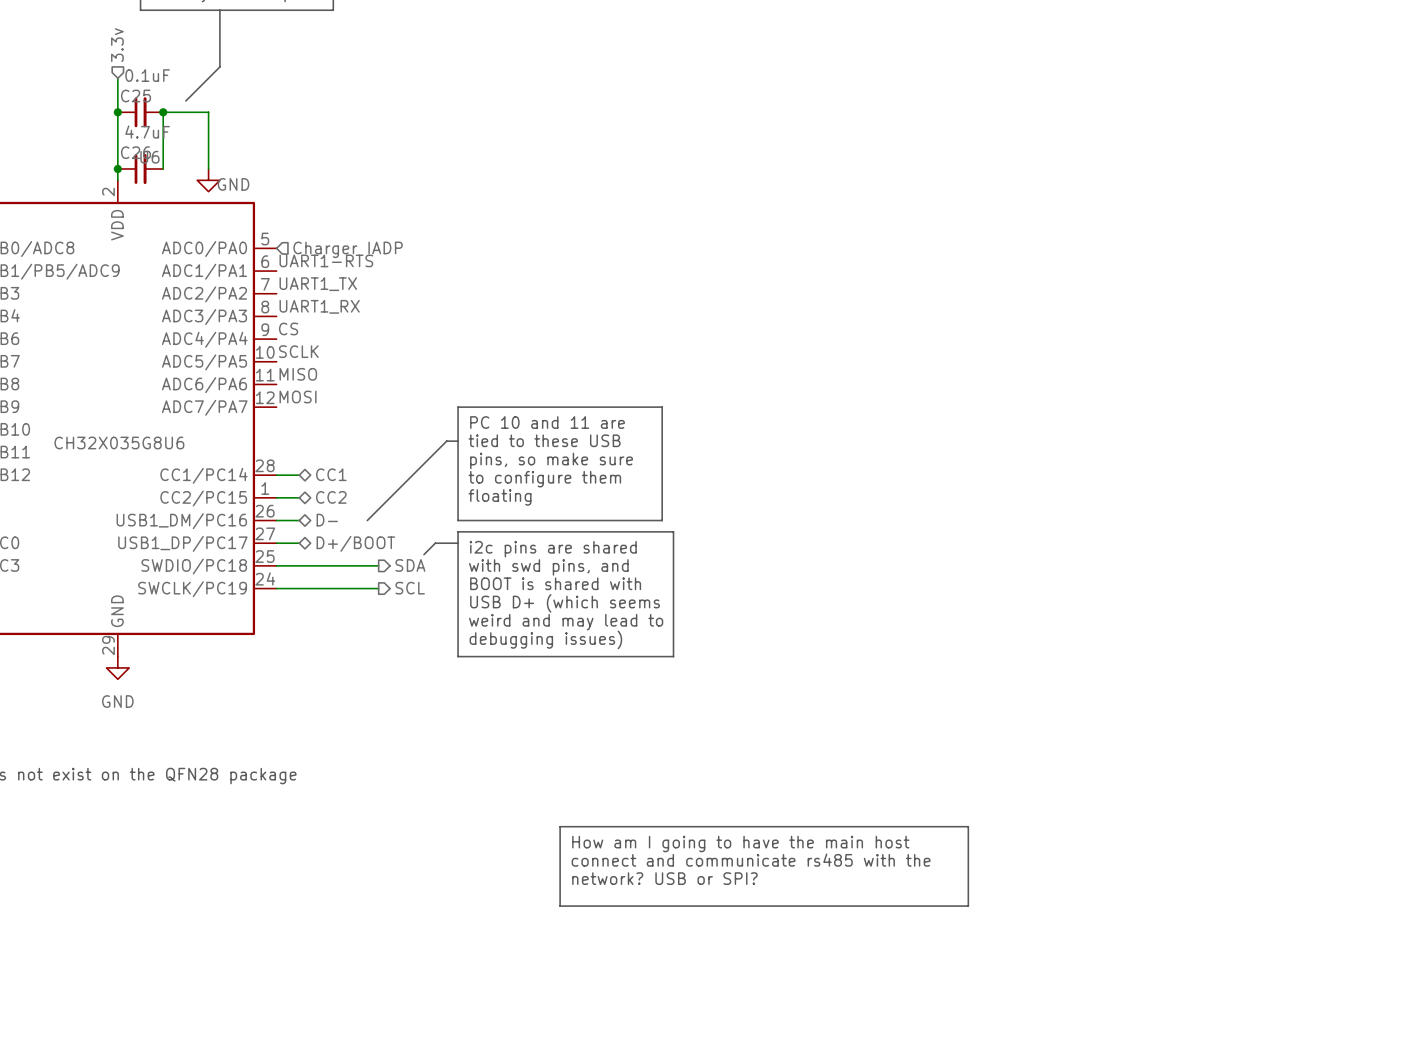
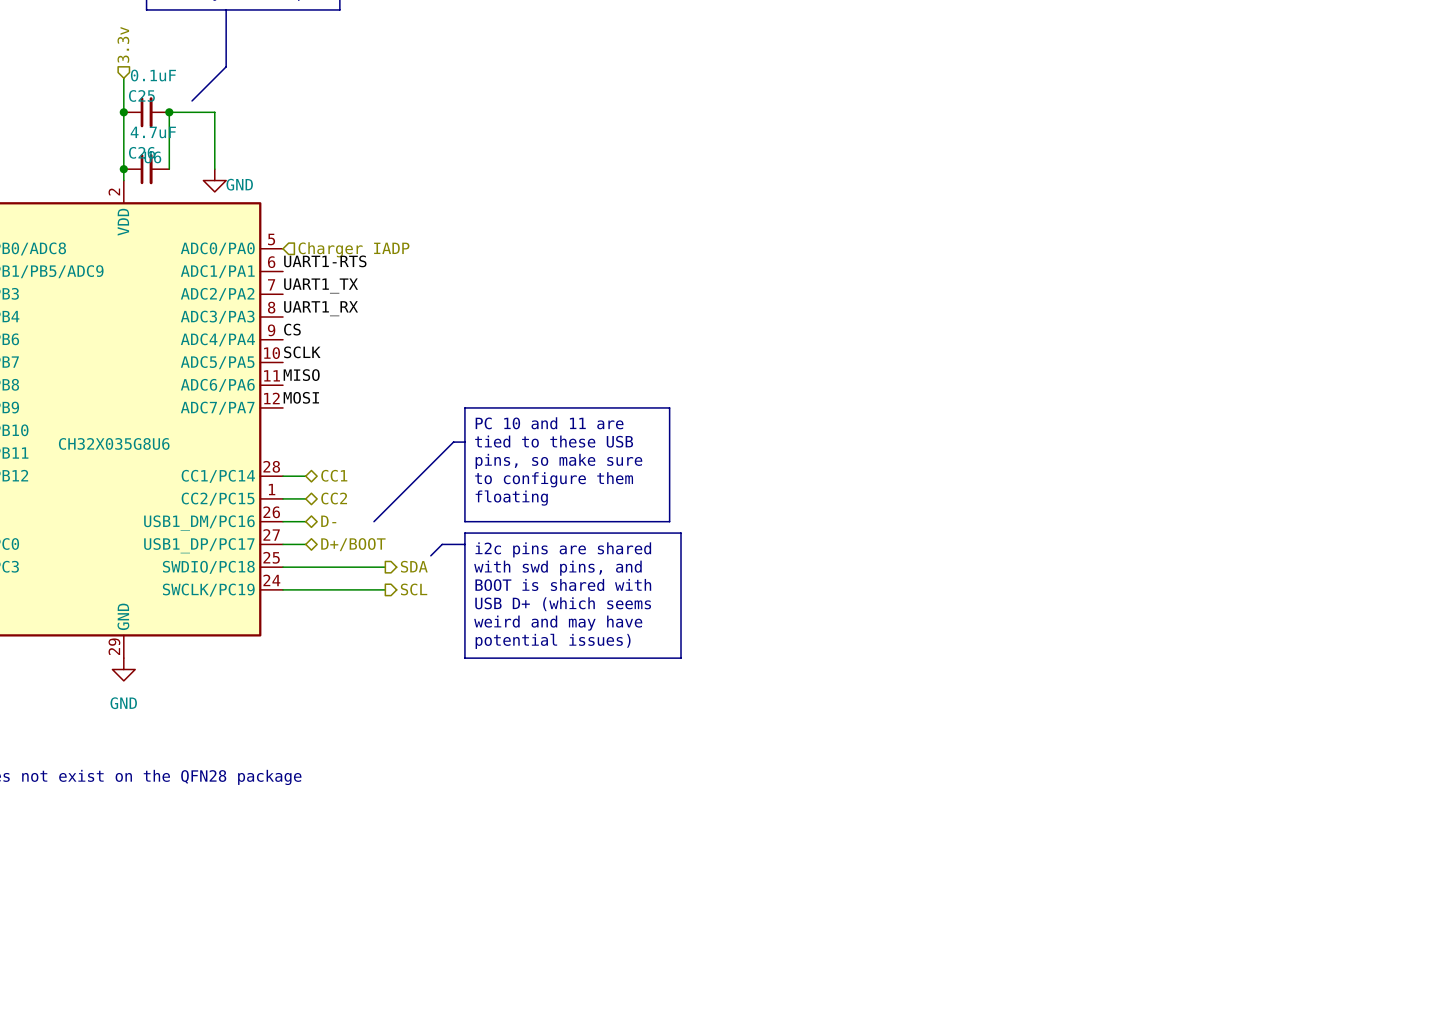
text: weird and may lead to (566, 622) -> weird and may have (558, 623)
text: debugging issues) (545, 639) -> potential issues) (553, 641)
line: (560, 826) (968, 826) (968, 906) (560, 906) (560, 826) -> none
text: How am I going to have the main host (740, 843) -> none
text: connect and communicate rs485 with the (751, 860) -> none
text: network? USB or SPI? (664, 878) -> none

